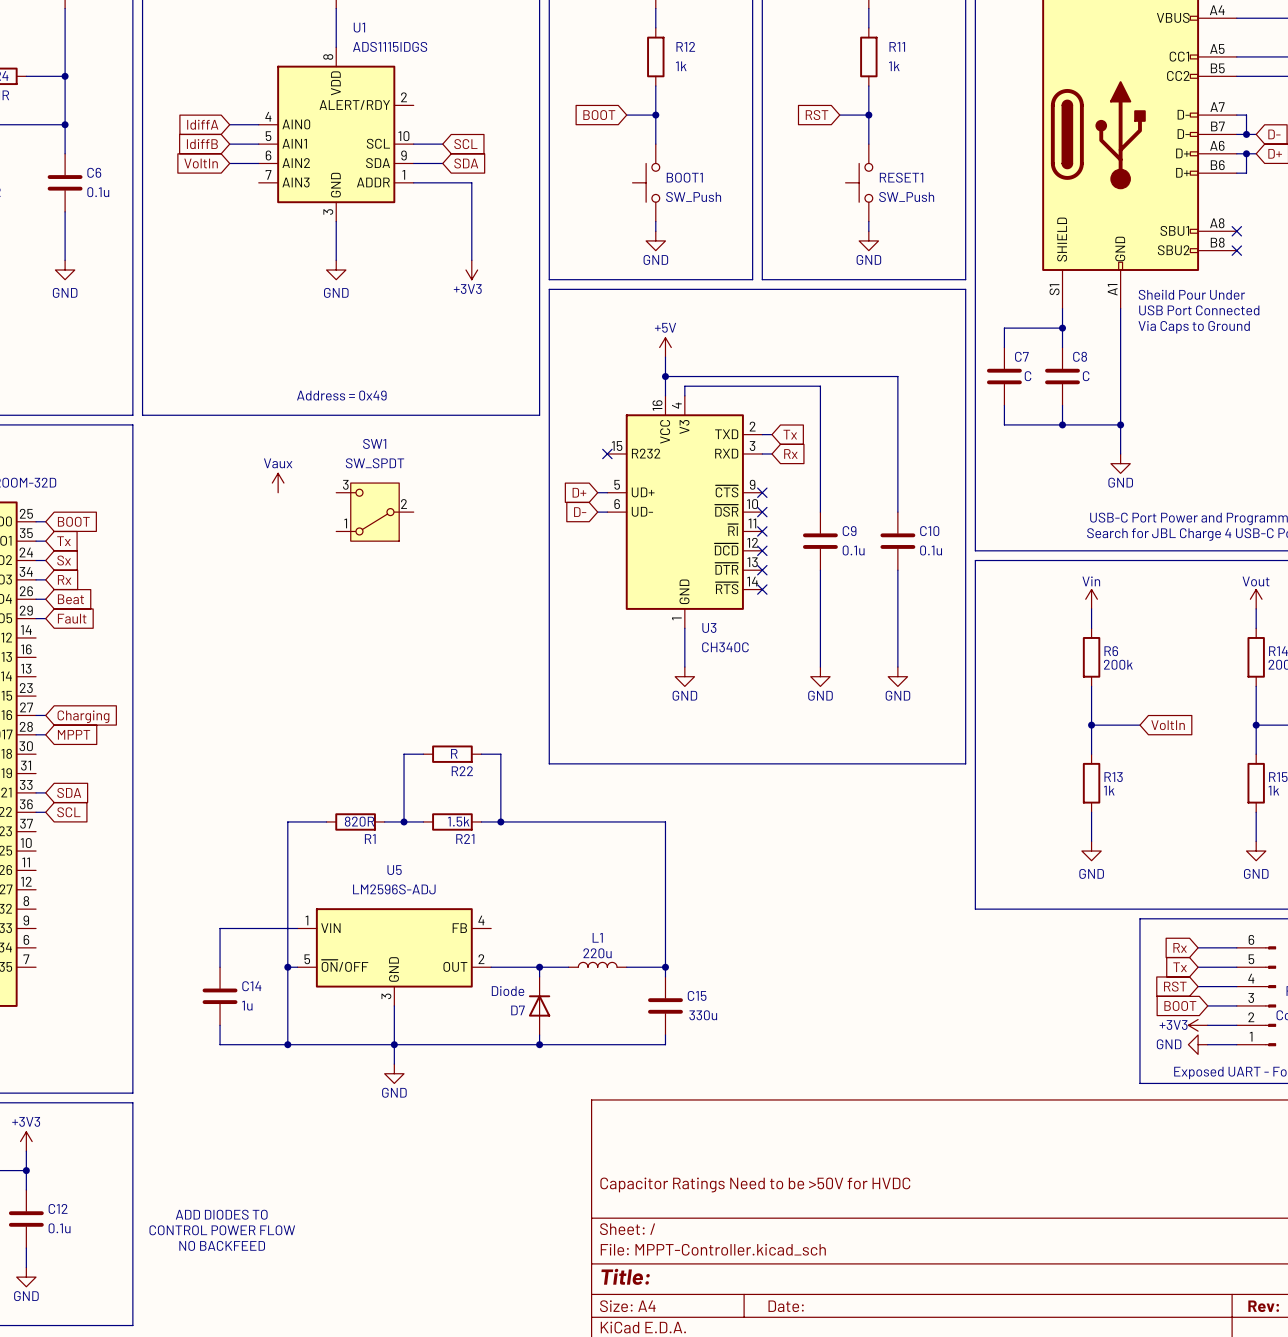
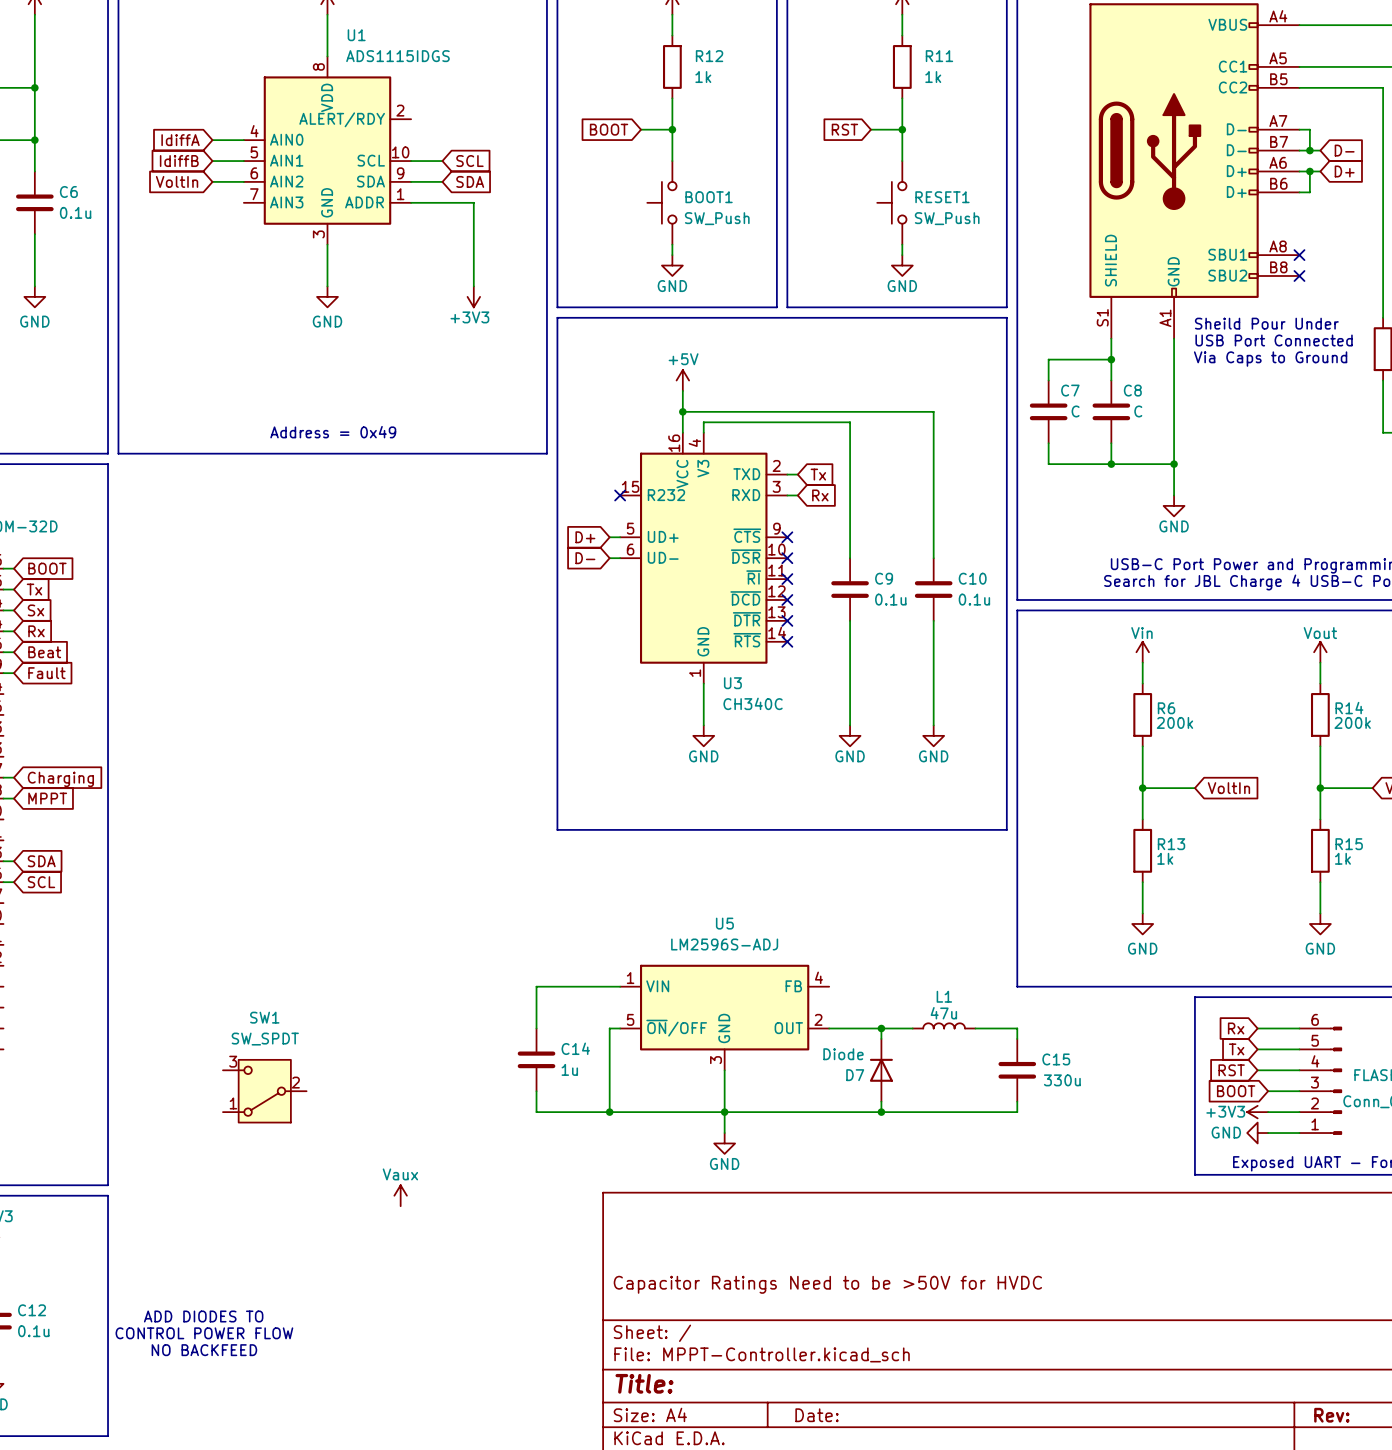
power symbol: Vaux (278, 483) -> none
SW1 position: (374, 512) -> (264, 1091)
wire: (423, 754) (404, 754) (404, 821) -> none
R22: R (452, 754) -> none
wire: (481, 754) (500, 754) (500, 821) -> none
wire: (326, 821) (287, 821) (287, 1044) -> none
R1: 820R (355, 821) -> none
wire: (384, 821) (423, 821) -> none
junction: (404, 821) -> none
R21: 1.5k (452, 821) -> none
wire: (481, 821) (665, 821) (665, 976) -> none
junction: (500, 821) -> none
wire: none -> (620, 986) (536, 986) (536, 1028)
wire: (297, 928) (220, 928) (220, 967) -> none
wire: none -> (620, 1028) (609, 1028) (609, 1112)
wire: none -> (829, 1028) (912, 1028)
wire: none -> (881, 1028) (881, 1038)
junction: none -> (881, 1028)
wire: none -> (975, 1028) (1017, 1028) (1017, 1038)
L1 value: 220u (597, 953) -> 47u (943, 1013)
U5 position: (394, 957) -> (724, 1017)
L1 position: (597, 964) -> (944, 1025)
wire: (287, 967) (297, 967) -> none
junction: (287, 967) -> none
wire: (491, 967) (568, 967) -> none
wire: (539, 967) (539, 976) -> none
junction: (539, 967) -> none
junction: (665, 967) -> none
wire: none -> (724, 1070) (724, 1133)
C14 position: (220, 996) -> (536, 1059)
wire: (394, 1005) (394, 1064) -> none
wire: none -> (536, 1091) (536, 1112) (1017, 1112) (1017, 1101)
D7 position: (539, 1005) -> (881, 1070)
C15 position: (665, 1005) -> (1017, 1070)
wire: none -> (881, 1101) (881, 1112)
wire: (220, 1025) (220, 1044) (665, 1044) (665, 1035) -> none
junction: none -> (609, 1112)
junction: none -> (724, 1112)
junction: none -> (881, 1112)
wire: (539, 1035) (539, 1044) -> none
junction: (287, 1044) -> none
junction: (394, 1044) -> none
junction: (539, 1044) -> none
power symbol: none -> GND (724, 1143)
power symbol: GND (394, 1073) -> none
power symbol: none -> Vaux (400, 1195)

